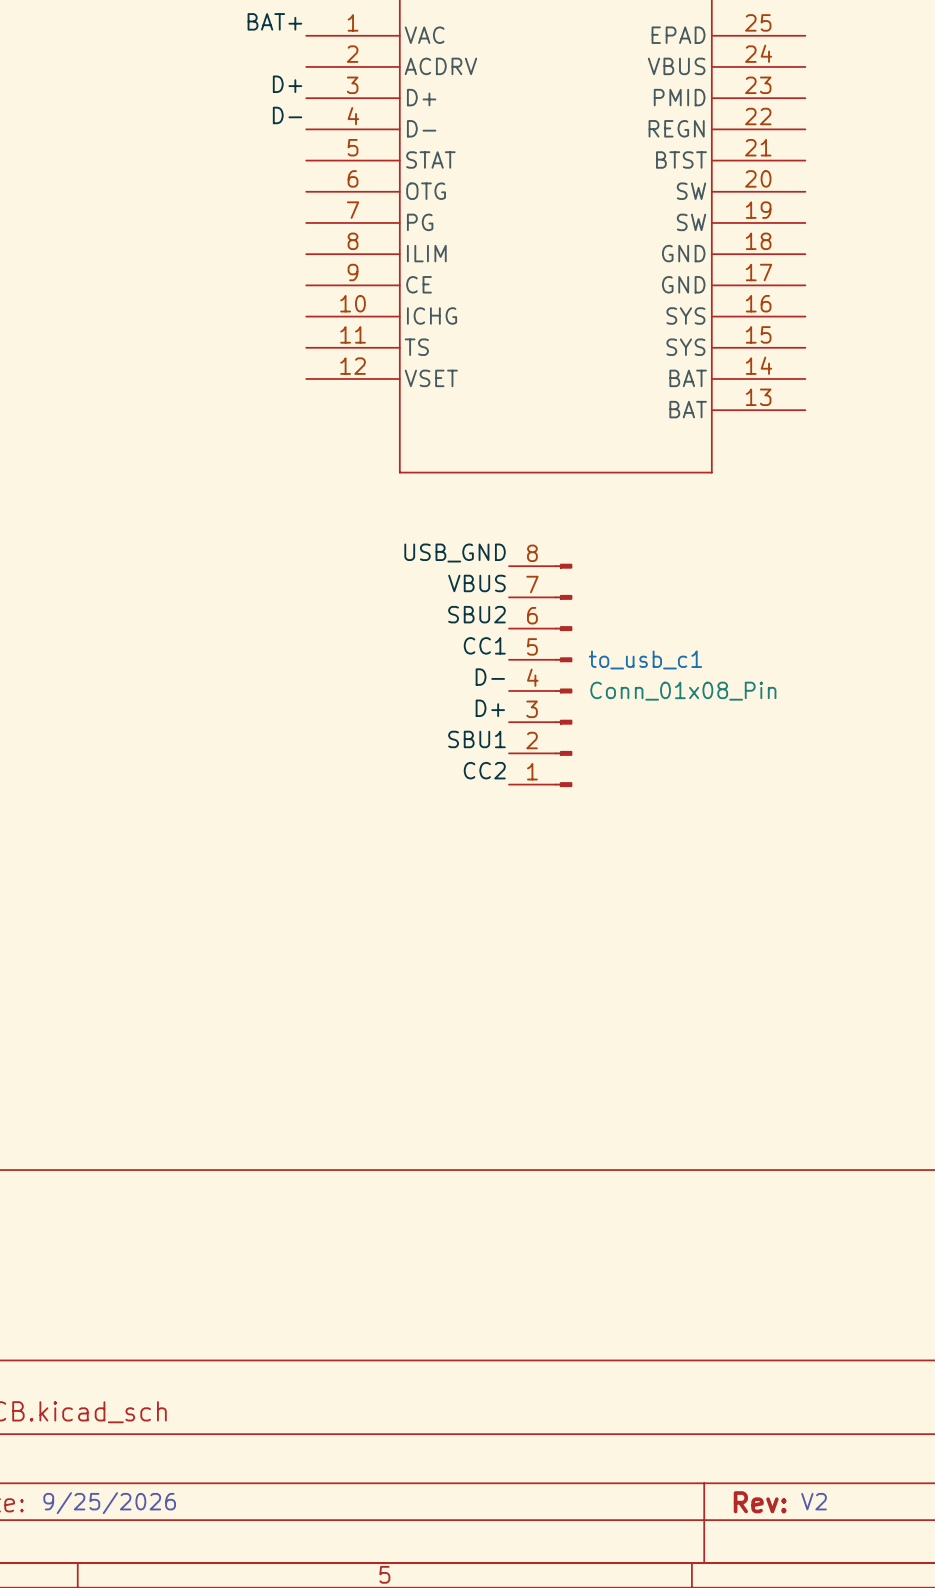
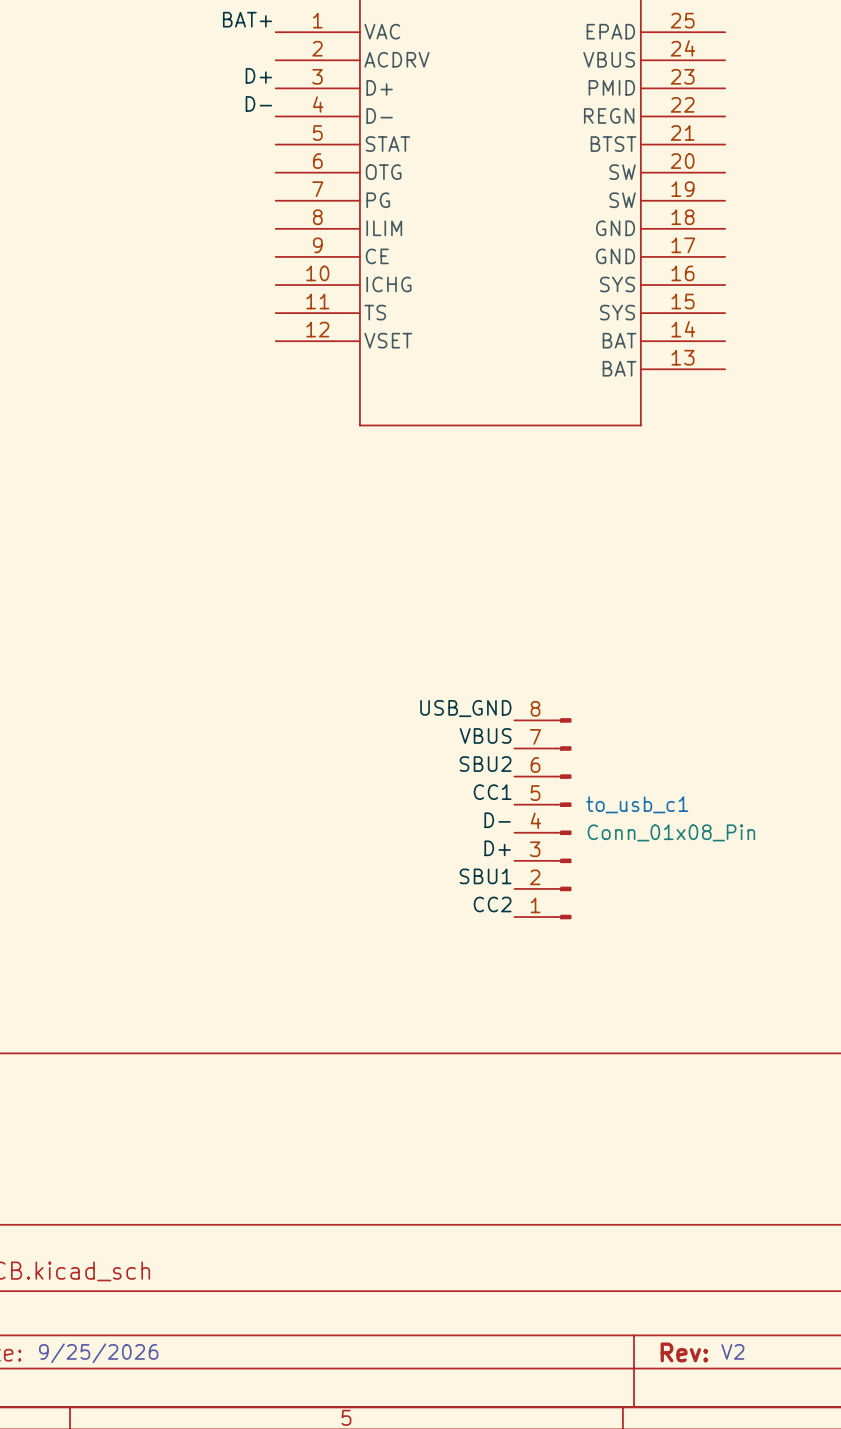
label position: USB_GND (455, 553) -> USB_GND (465, 708)
label position: VBUS (476, 583) -> VBUS (485, 735)
label position: SBU2 (476, 614) -> SBU2 (485, 764)
label position: CC1 (484, 645) -> CC1 (492, 792)
to_usb_c1 position: (540, 675) -> (542, 818)
label position: D- (490, 677) -> D- (497, 820)
label position: D+ (490, 708) -> D+ (497, 848)
label position: SBU1 (476, 739) -> SBU1 (485, 876)
label position: CC2 (484, 770) -> CC2 (492, 904)

